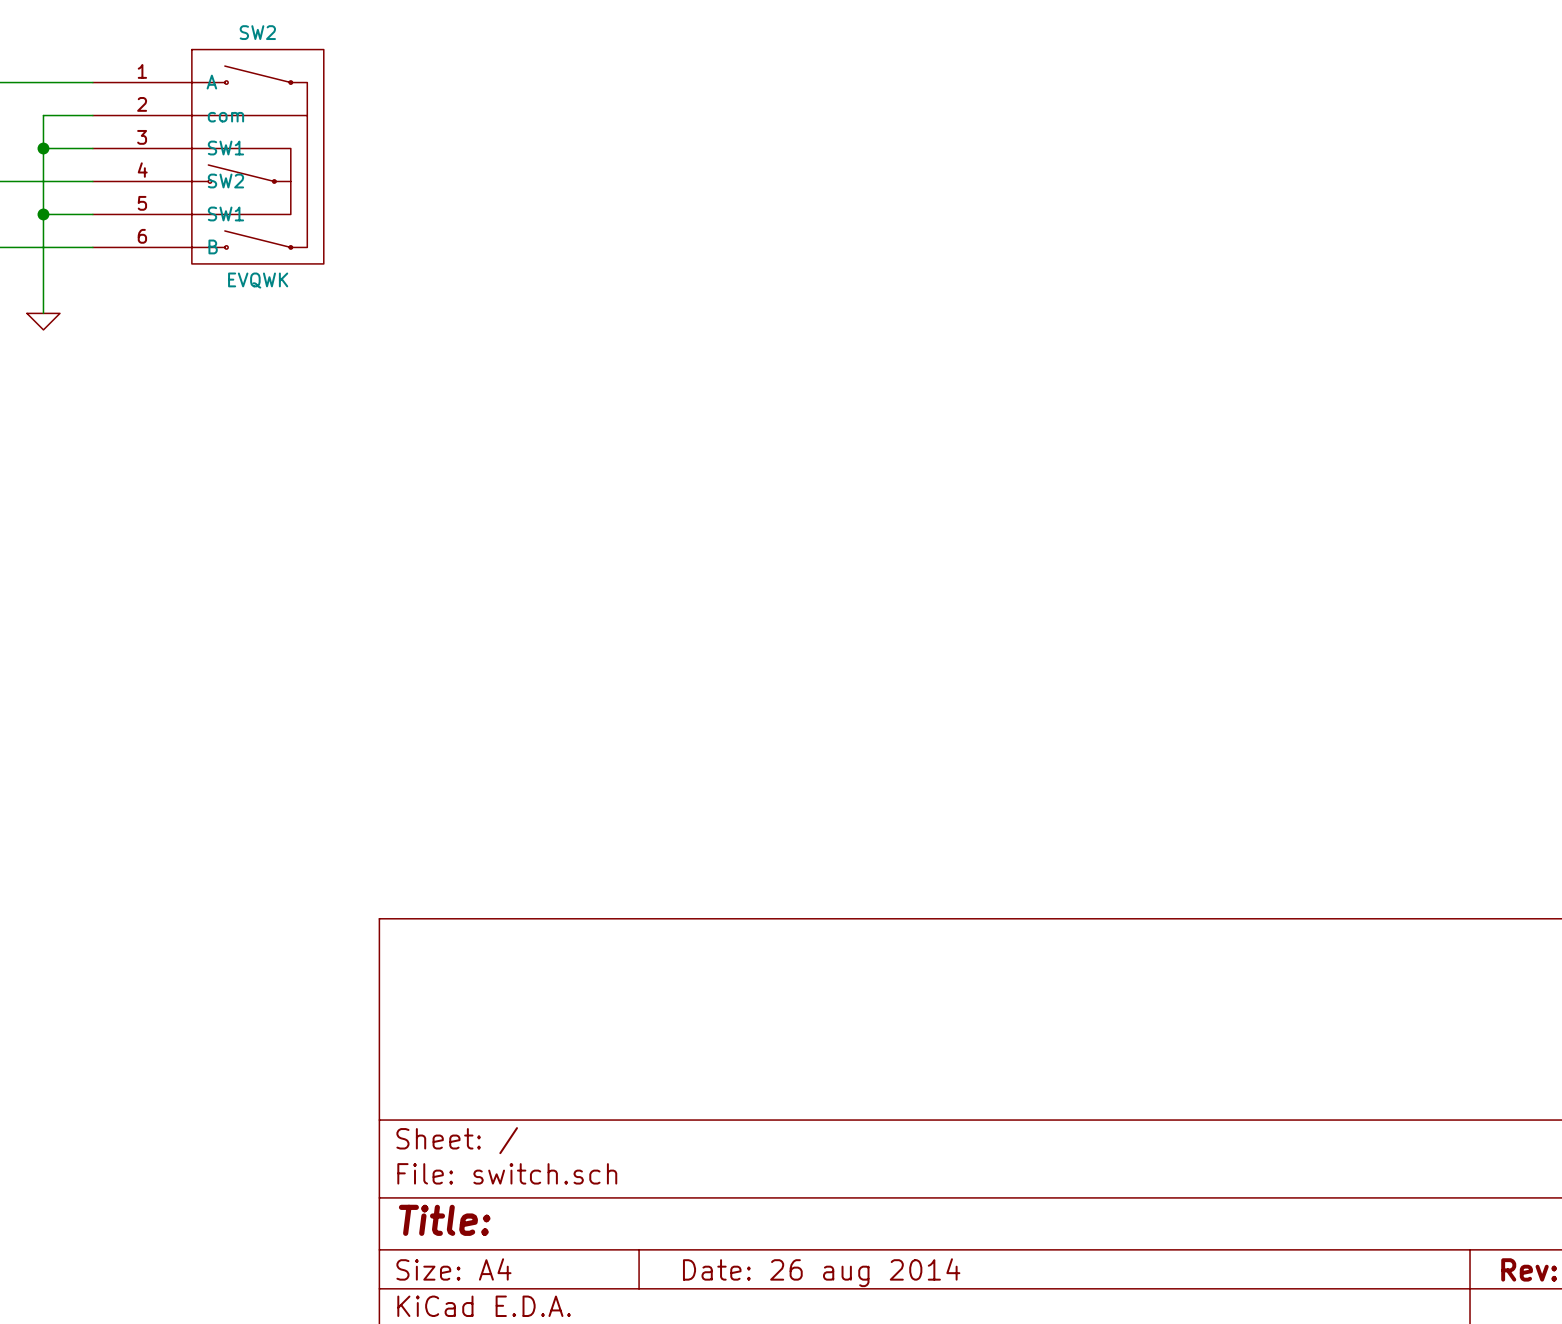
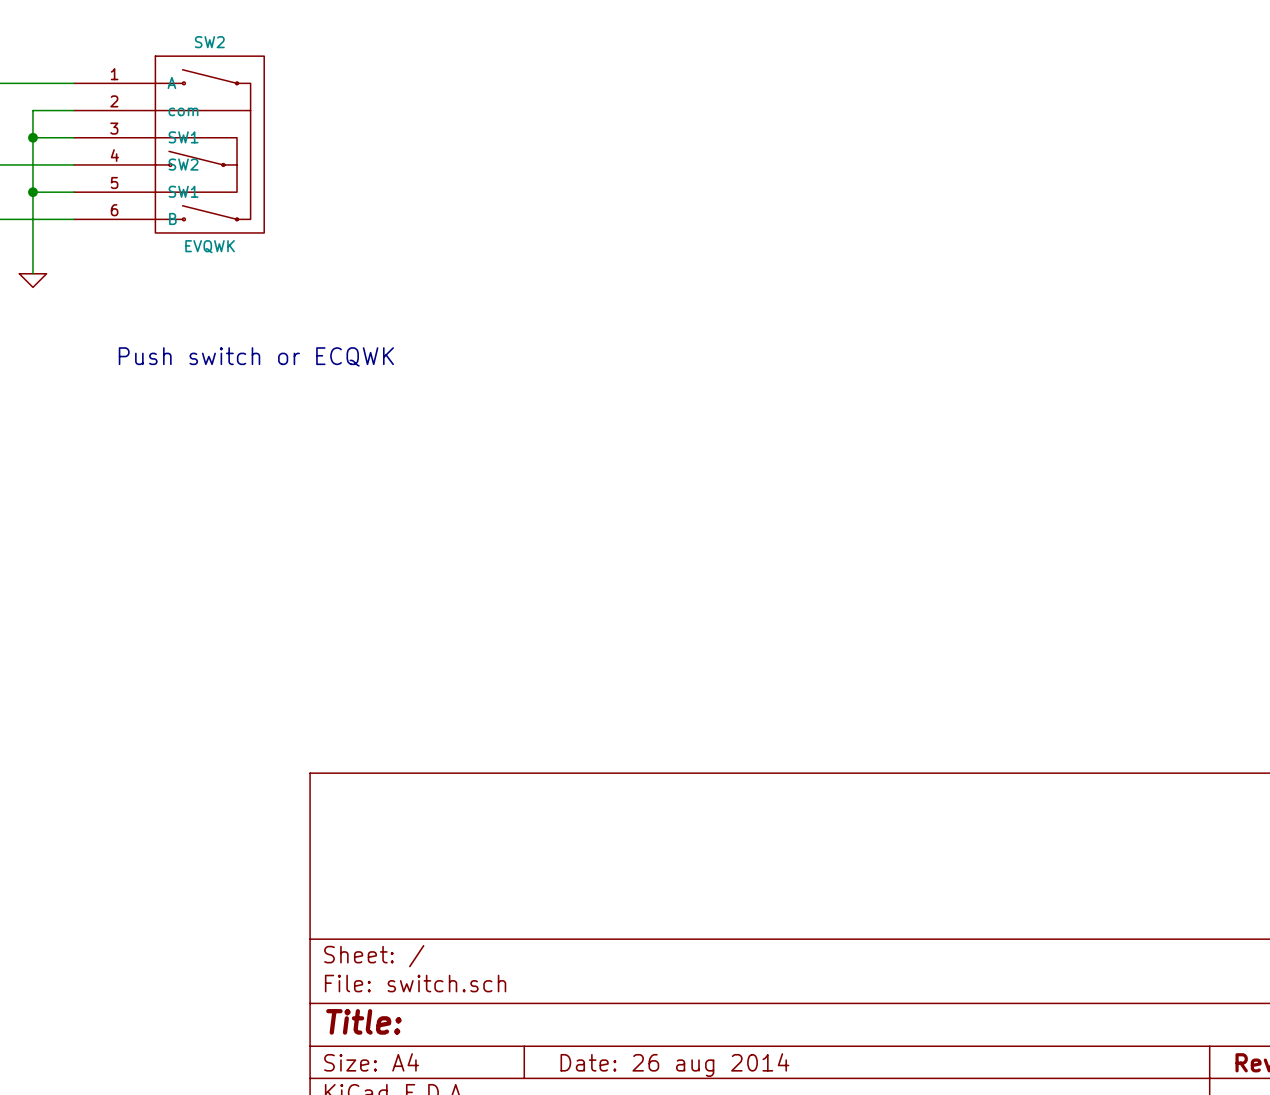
text: none -> Push switch or ECQWK (256, 356)

